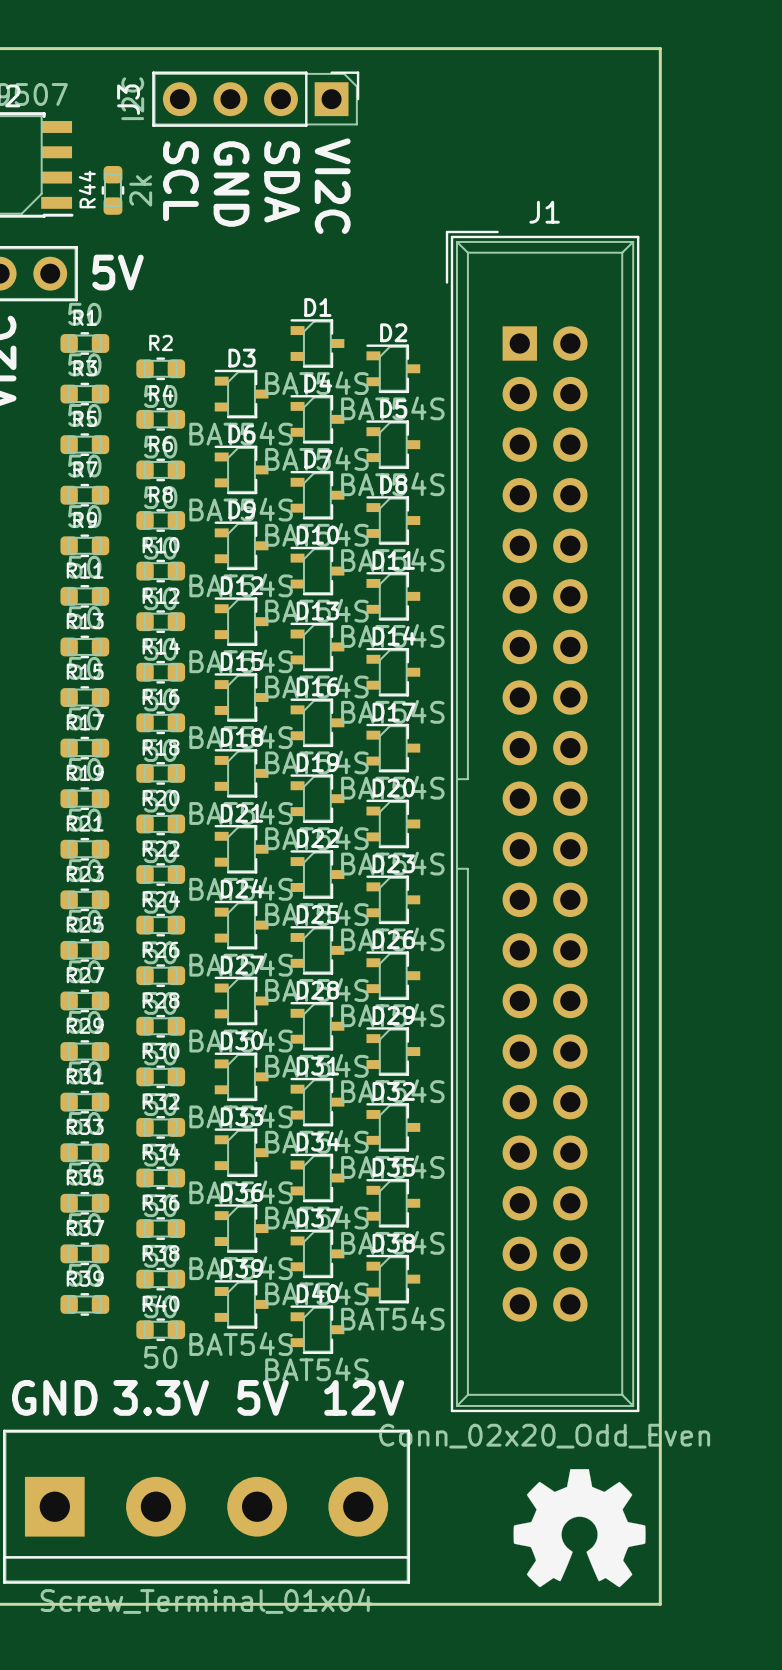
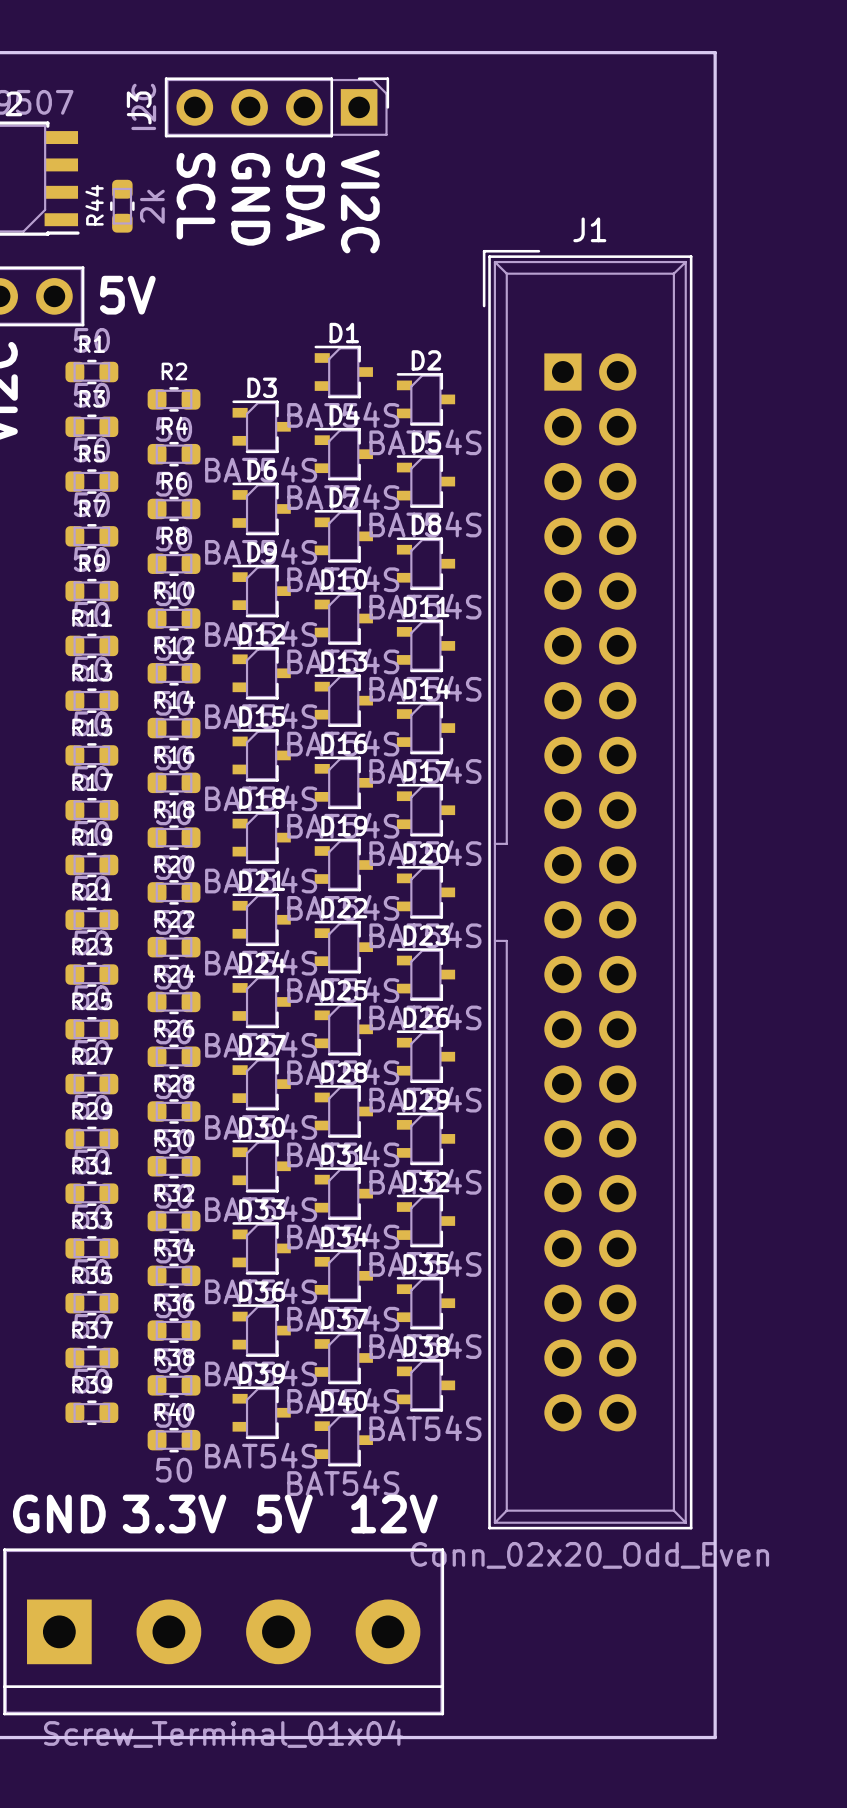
drawing: [513, 1469, 646, 1588] -> none

